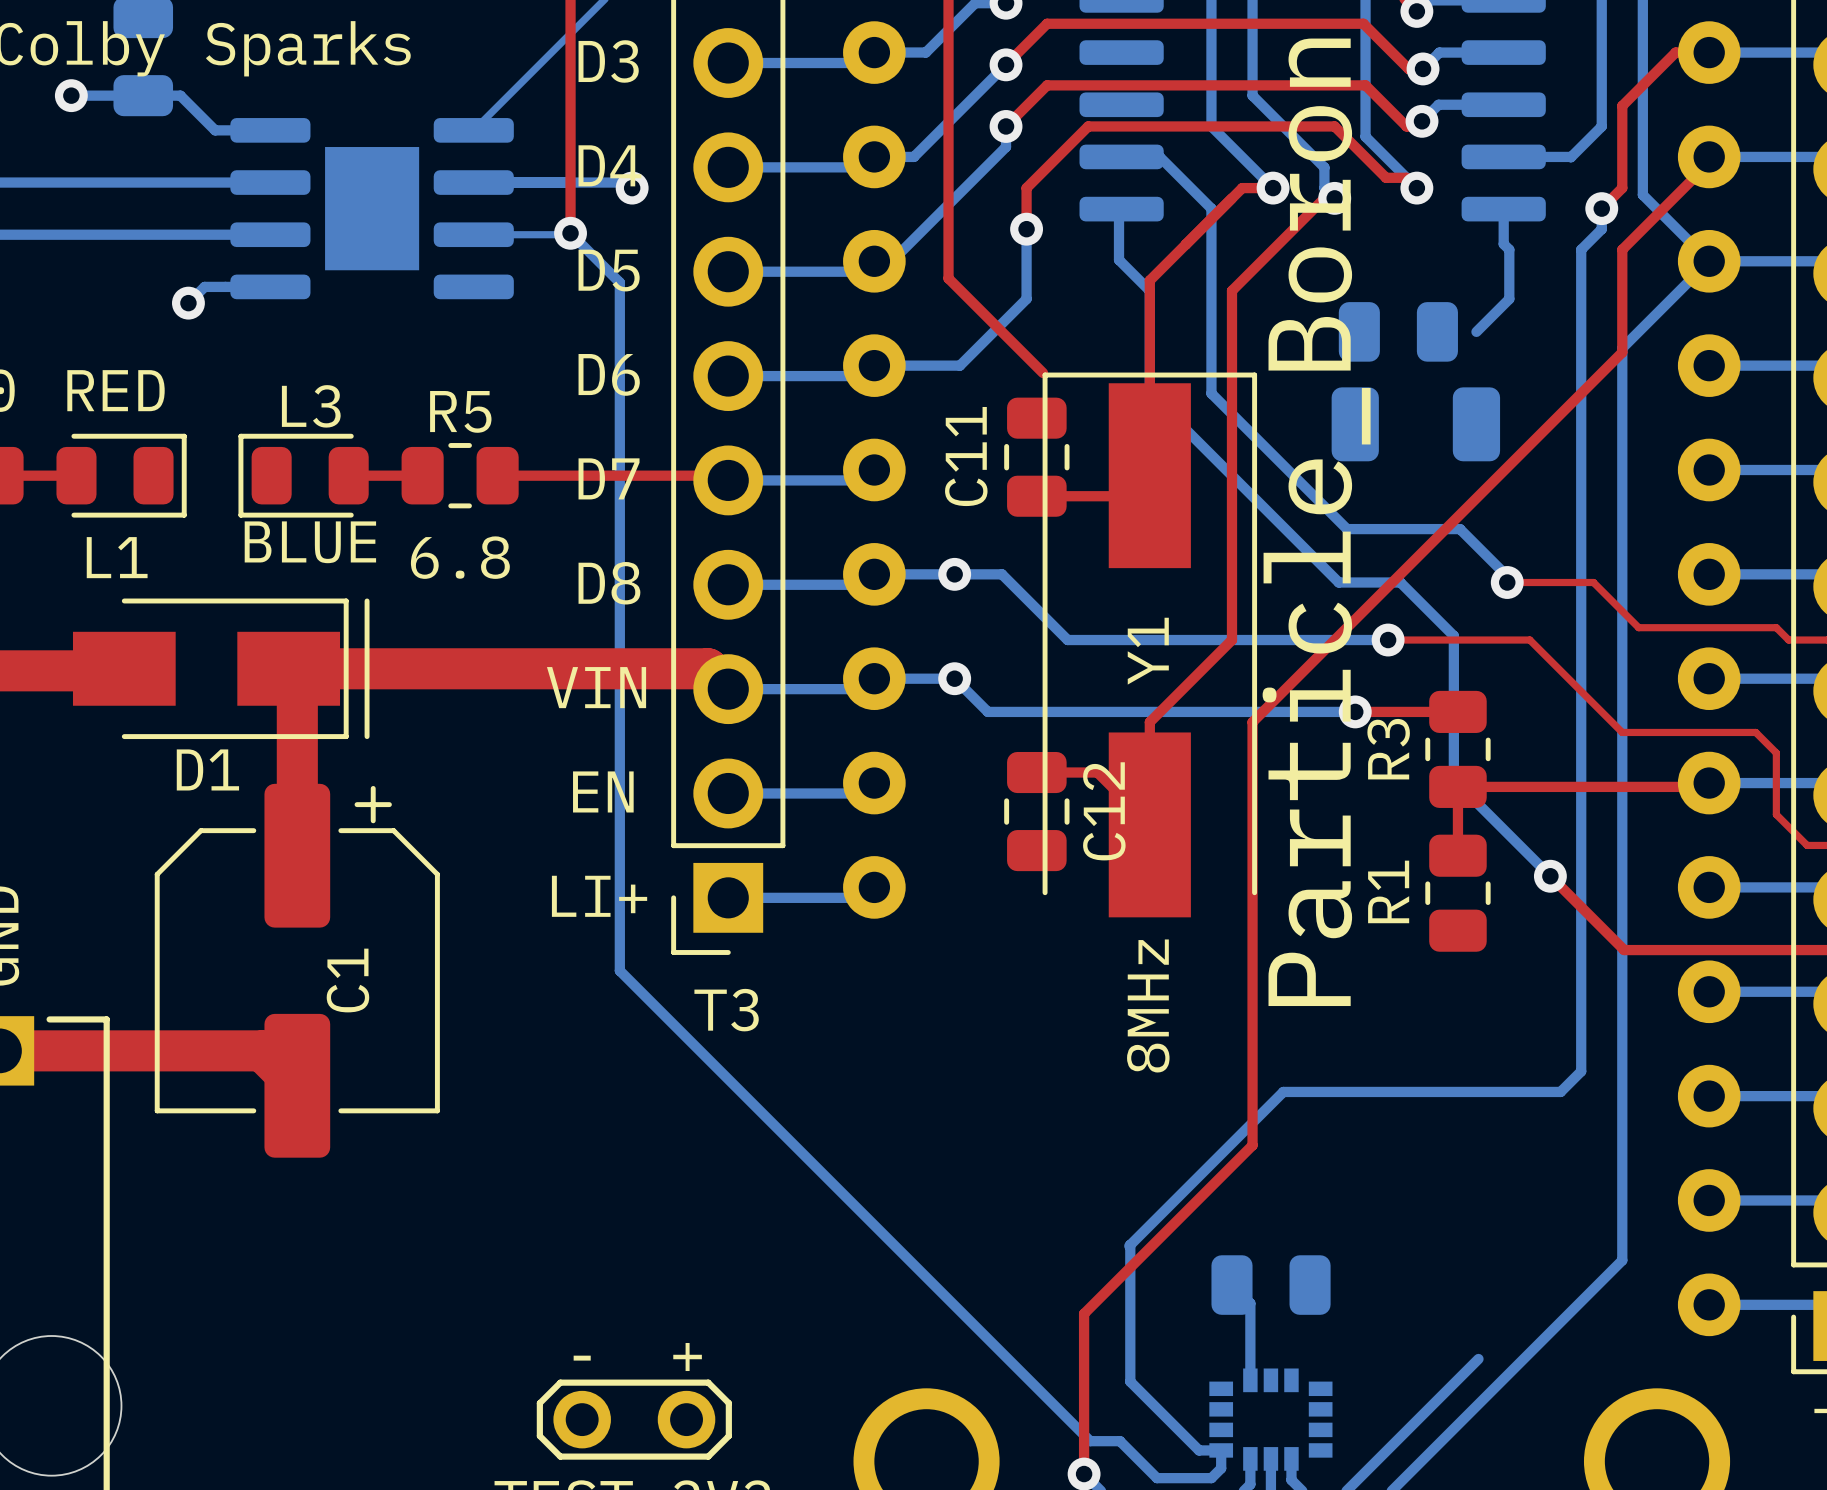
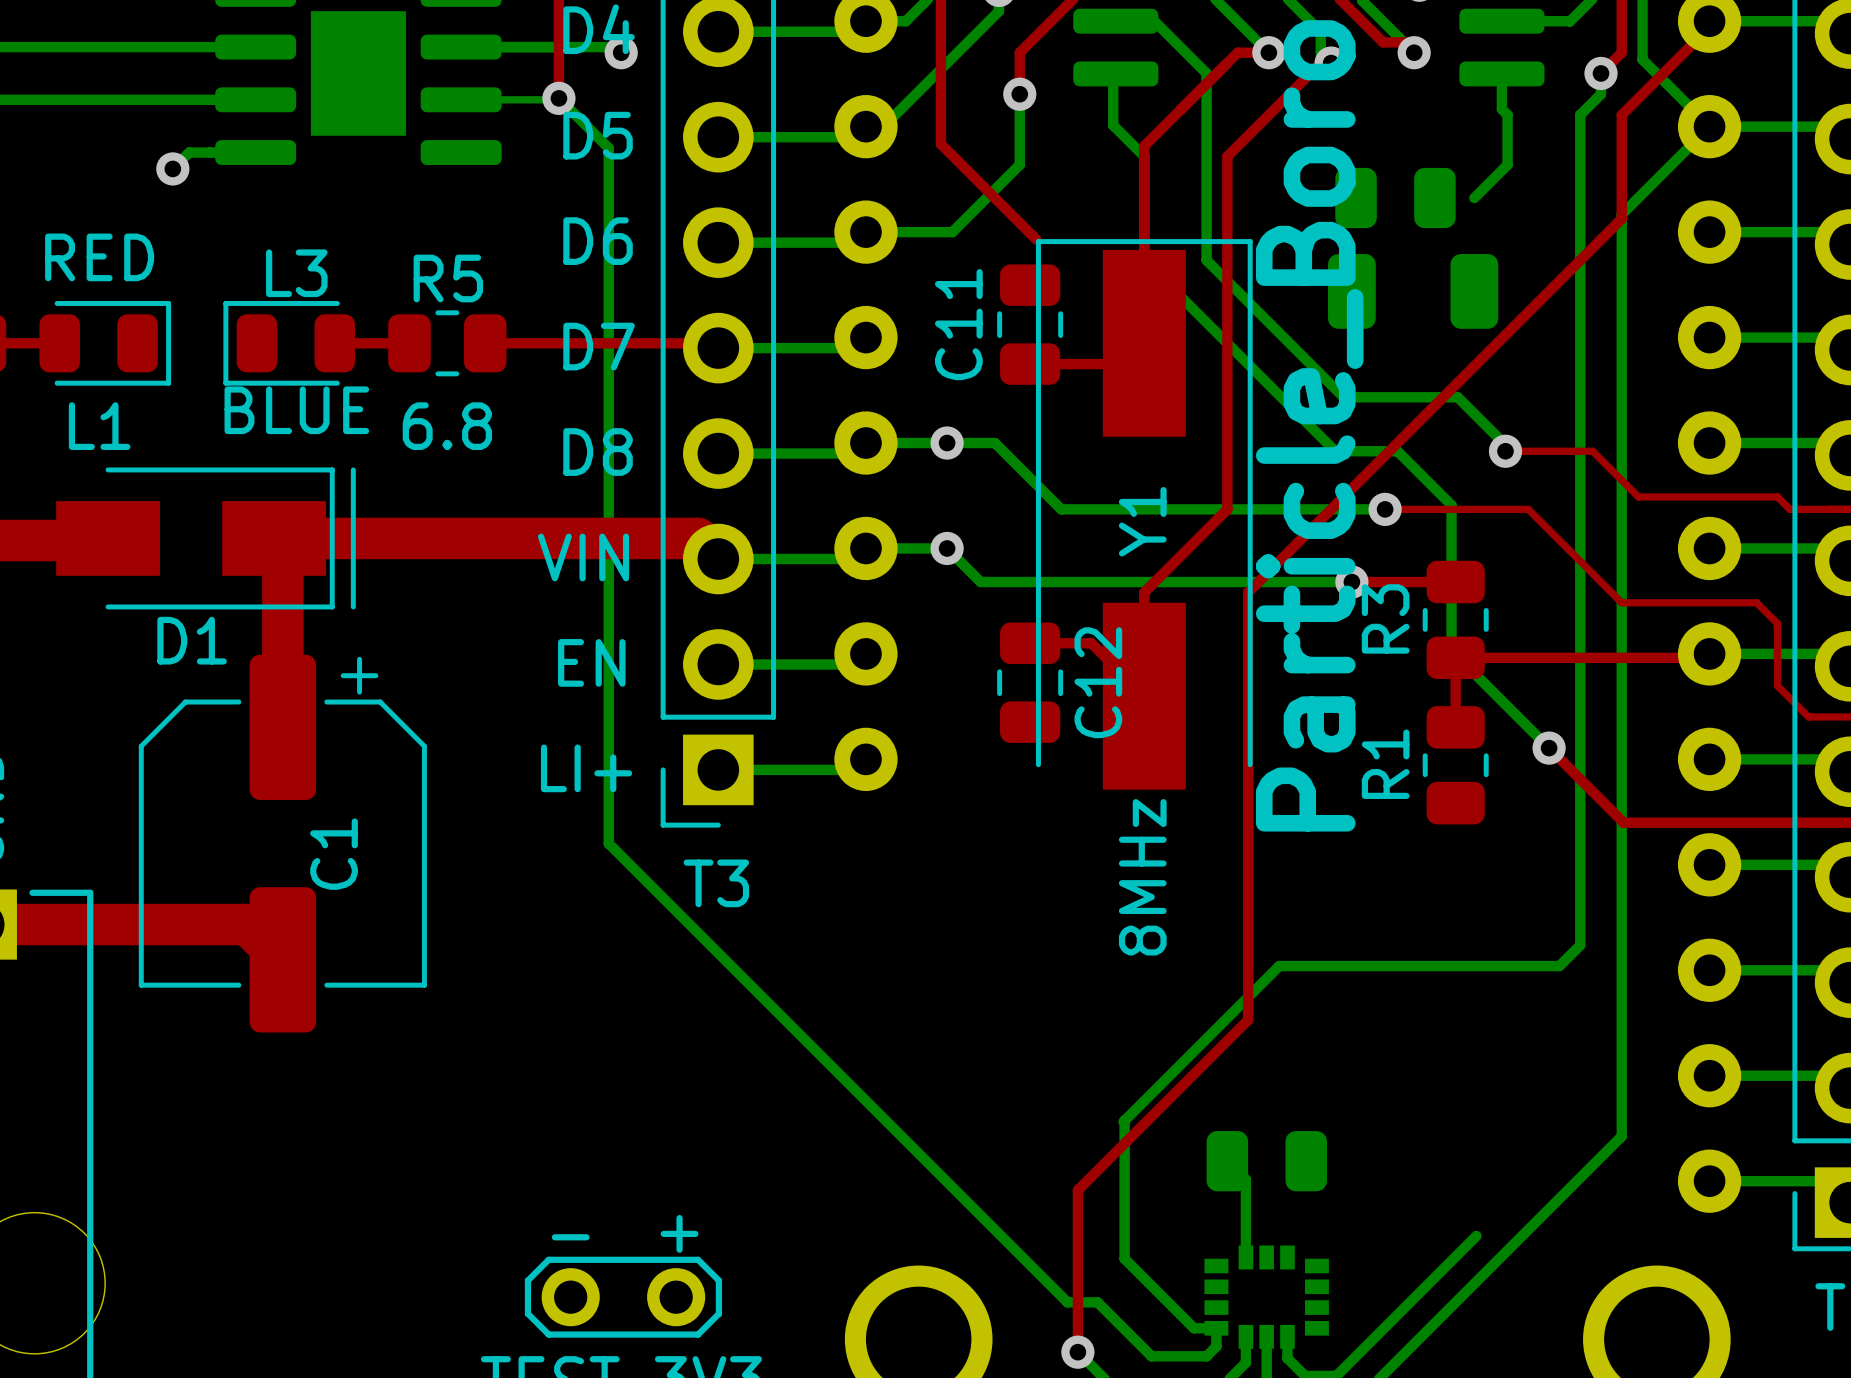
bottom track: (1073, 1424) (1090, 1441) (1120, 1441) -> (1067, 1302) (1097, 1302) (1114, 1318)

